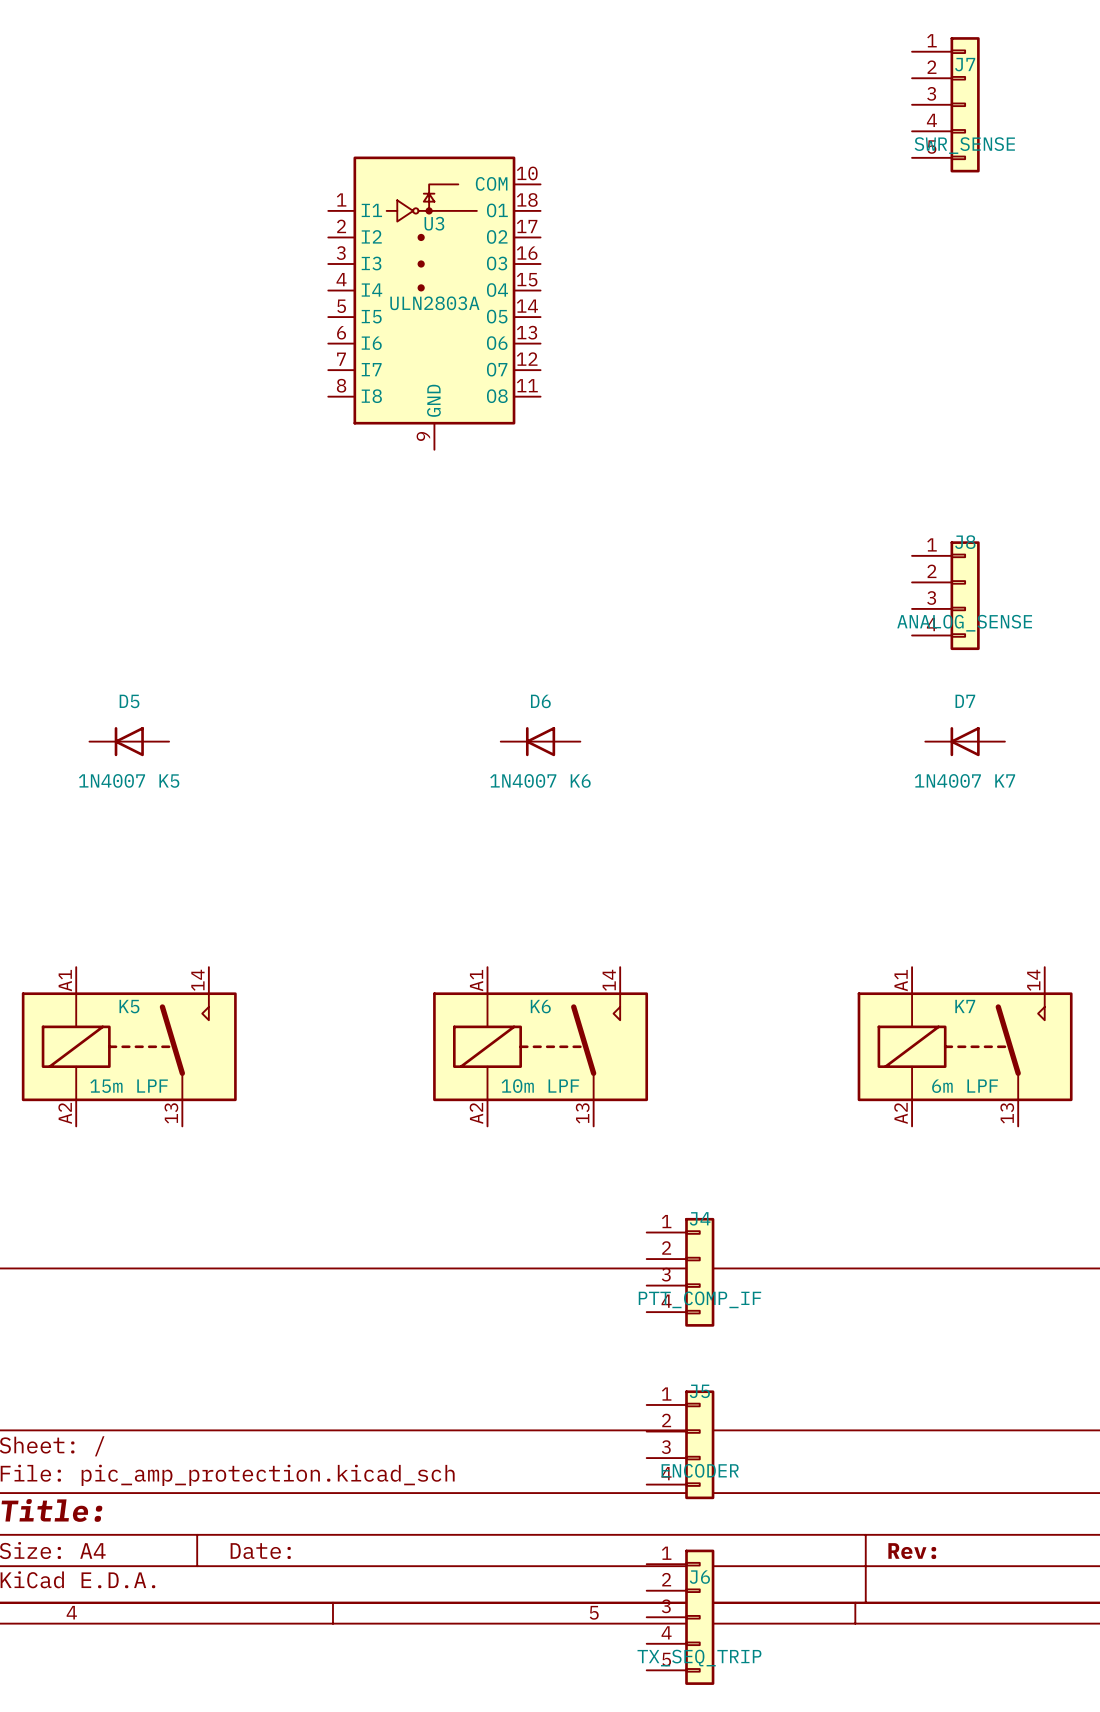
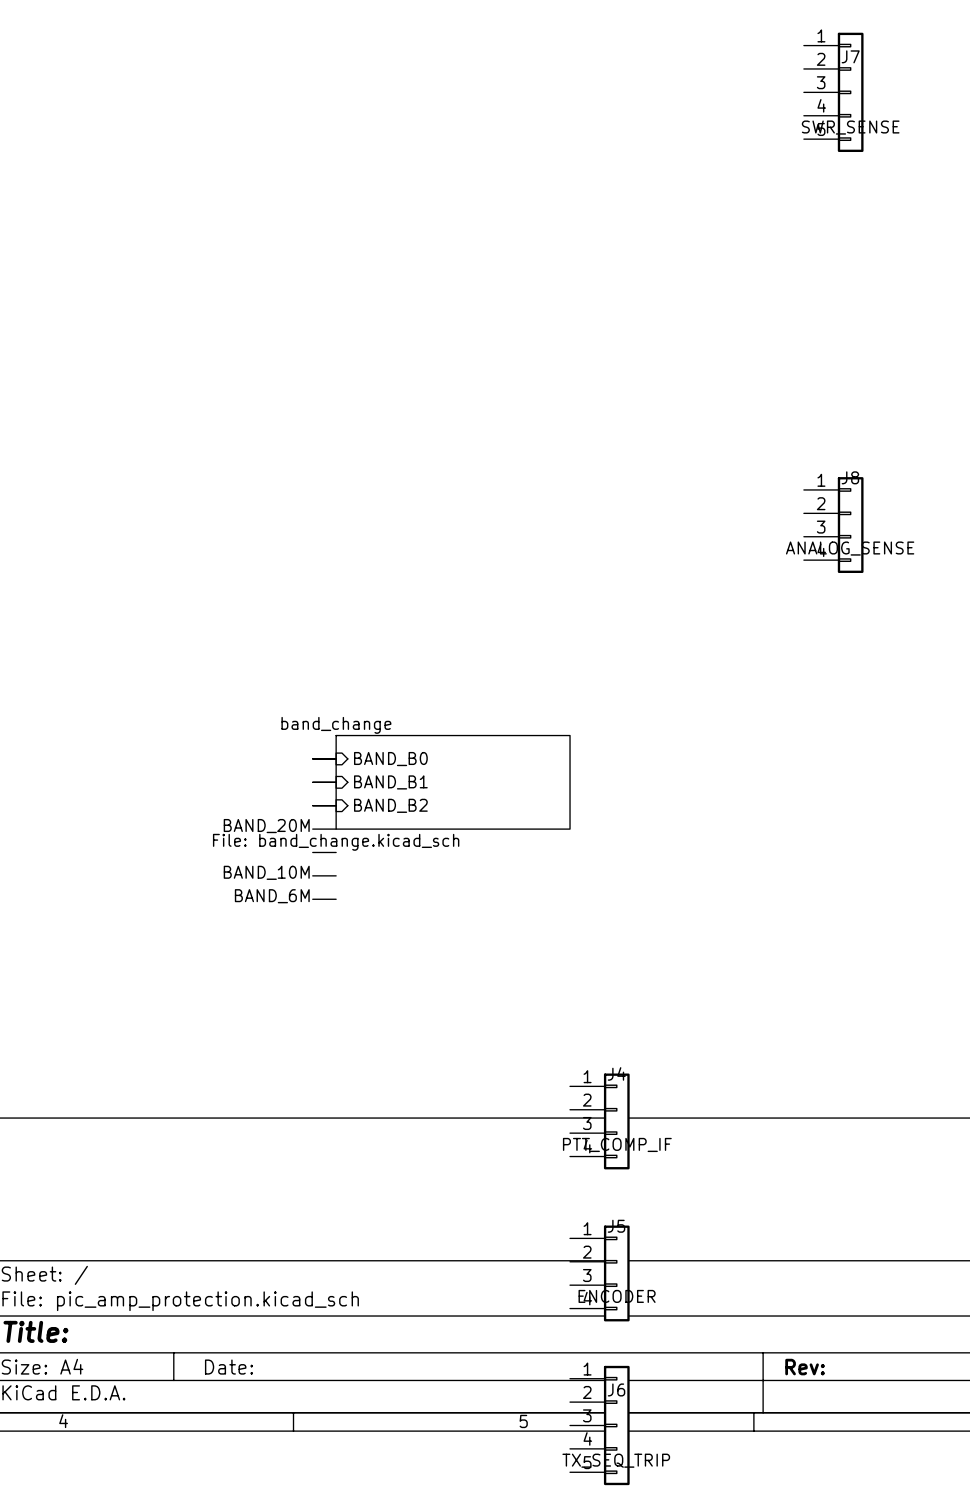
U3: ULN2803A (434, 303) -> none
D5: 1N4007 K5 (129, 741) -> none
D6: 1N4007 K6 (540, 741) -> none
D7: 1N4007 K7 (965, 741) -> none
wire: none -> (312, 758) (336, 758)
sheet pin: none -> BAND_B0 (390, 759)
wire: none -> (312, 782) (336, 782)
sheet band_change: none -> File: band_change.kicad_sch (453, 782)
sheet pin: none -> BAND_B1 (390, 782)
wire: none -> (312, 805) (336, 805)
sheet pin: none -> BAND_B2 (390, 805)
label: none -> BAND_20M (266, 826)
wire: none -> (312, 829) (336, 829)
wire: none -> (312, 852) (336, 852)
label: none -> BAND_10M (266, 872)
wire: none -> (312, 875) (336, 875)
label: none -> BAND_6M (272, 896)
wire: none -> (312, 899) (336, 899)
K5: 15m LPF (129, 1046) -> none
K6: 10m LPF (540, 1046) -> none
K7: 6m LPF (965, 1046) -> none

